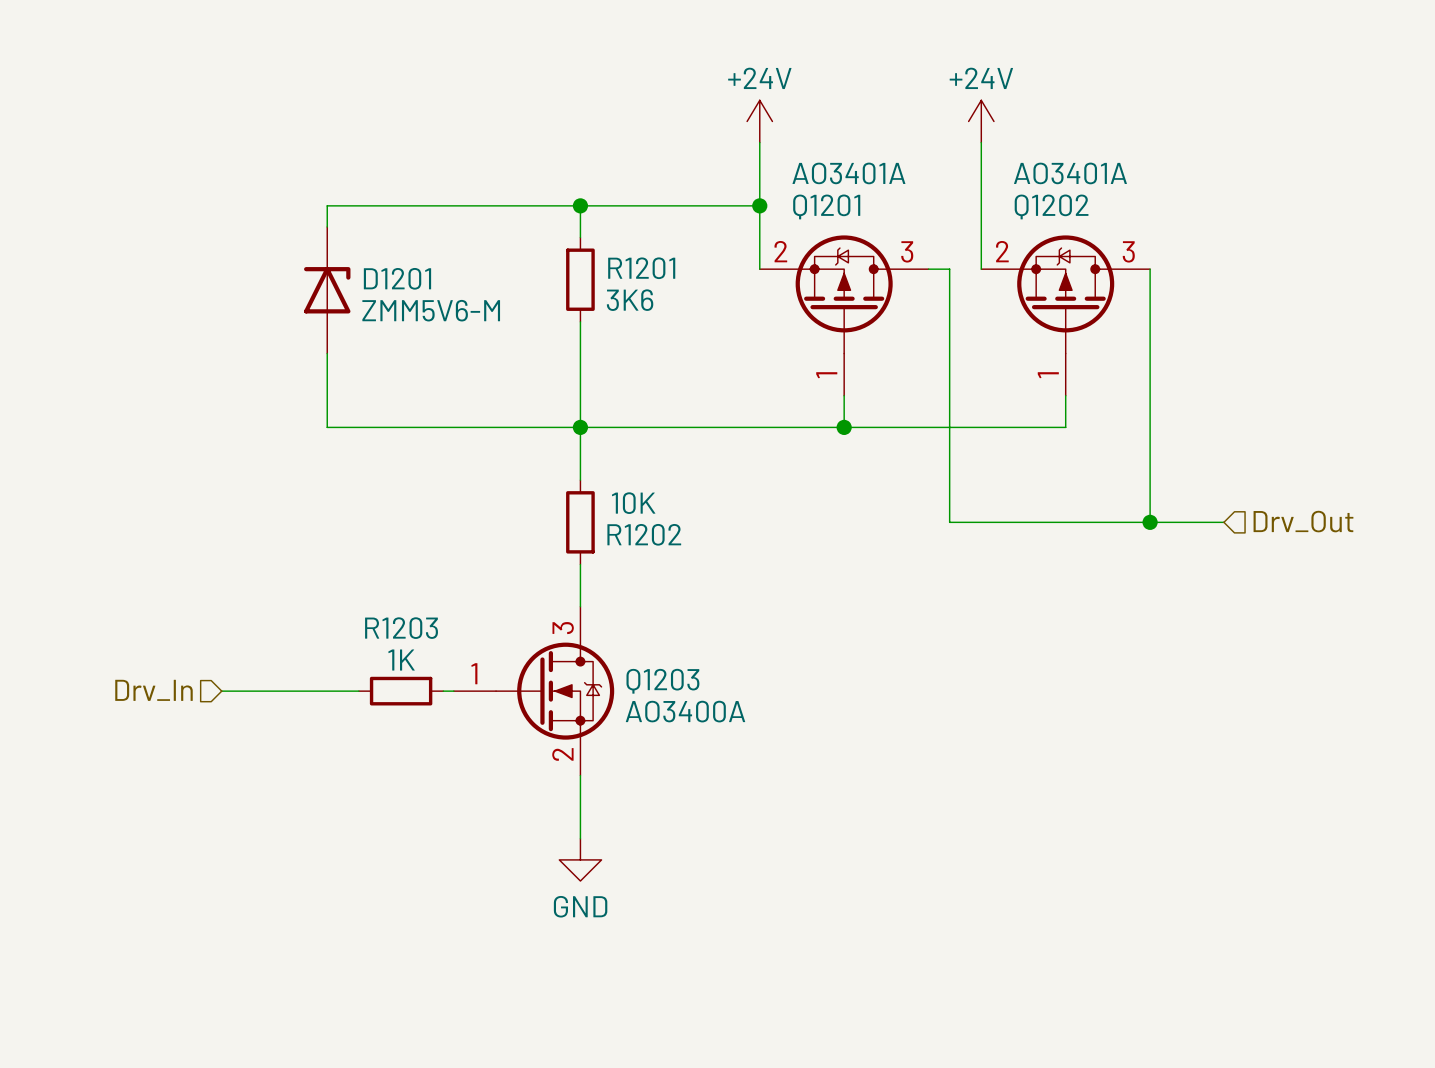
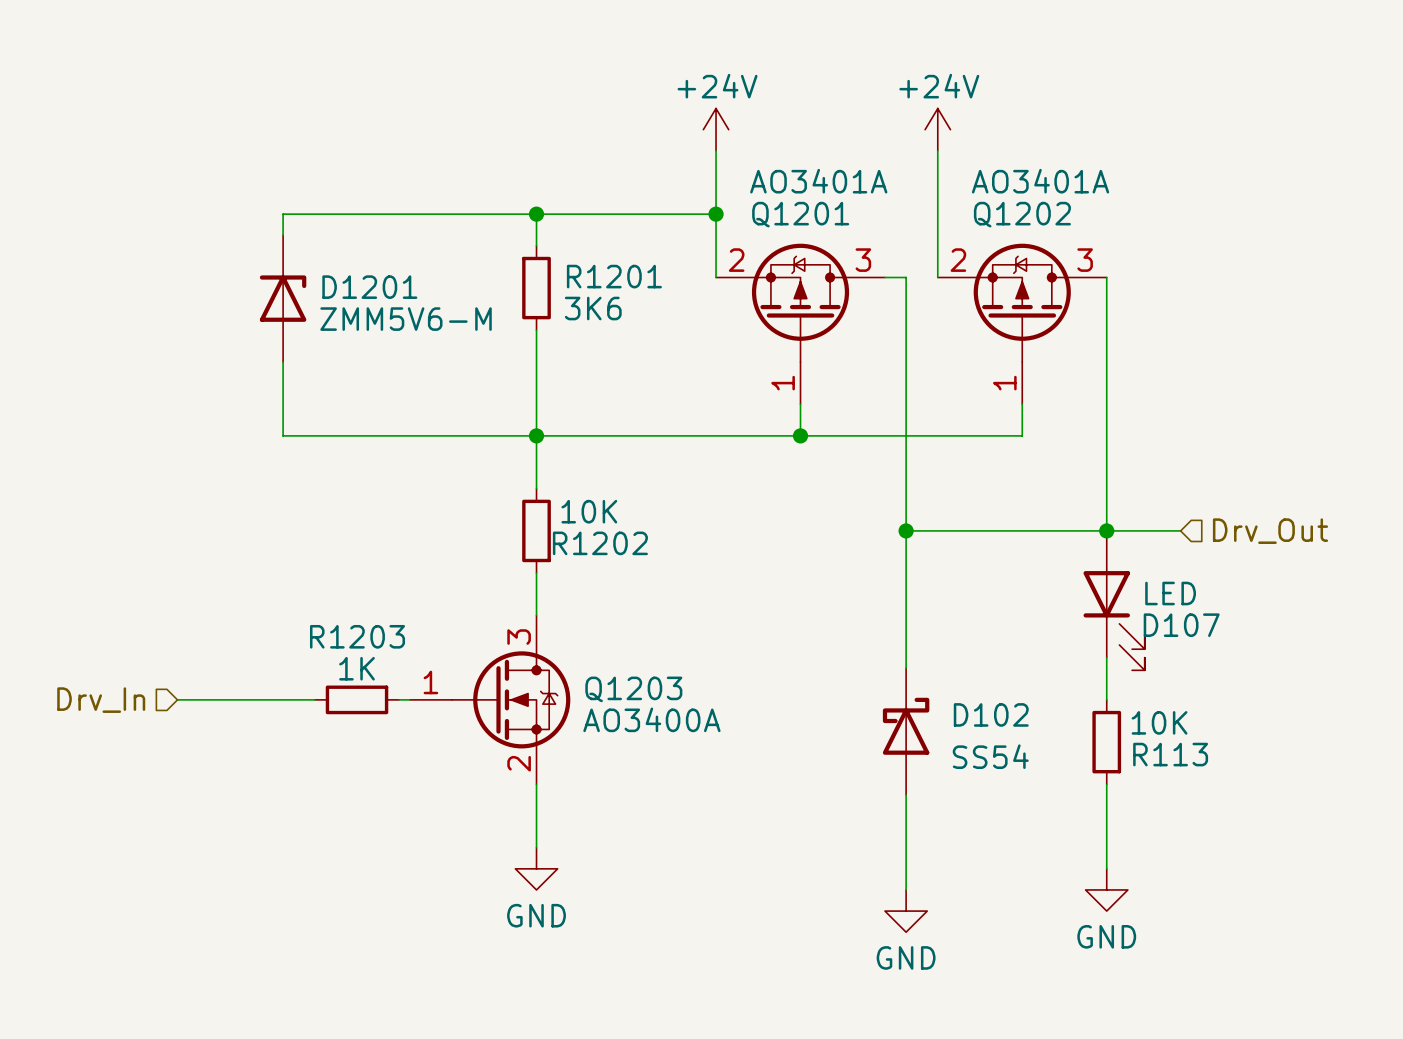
wire: none -> (906, 530) (906, 668)
junction: none -> (906, 530)
D107: none -> LED (1114, 600)
wire: none -> (1106, 657) (1106, 699)
D102: none -> SS54 (906, 731)
R113: none -> 10K (1106, 742)
wire: none -> (1106, 784) (1106, 868)
wire: none -> (906, 794) (906, 889)
power symbol: none -> GND (1106, 889)
power symbol: none -> GND (906, 911)

